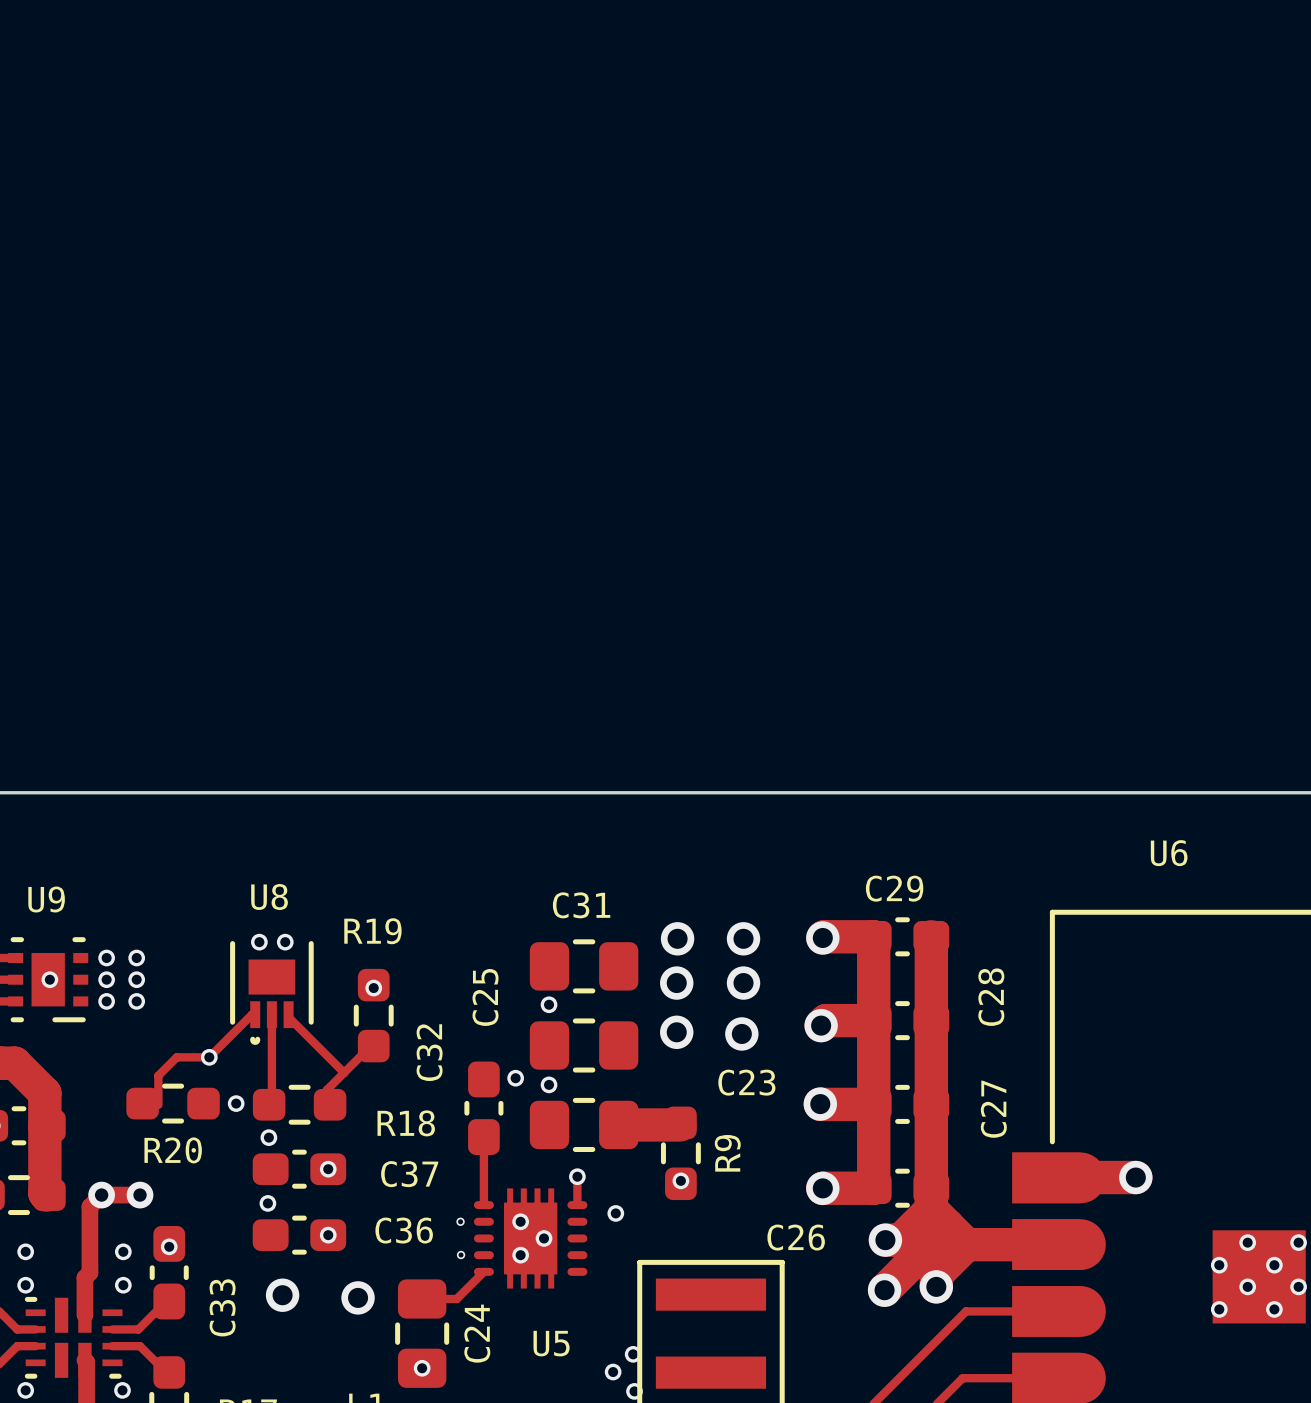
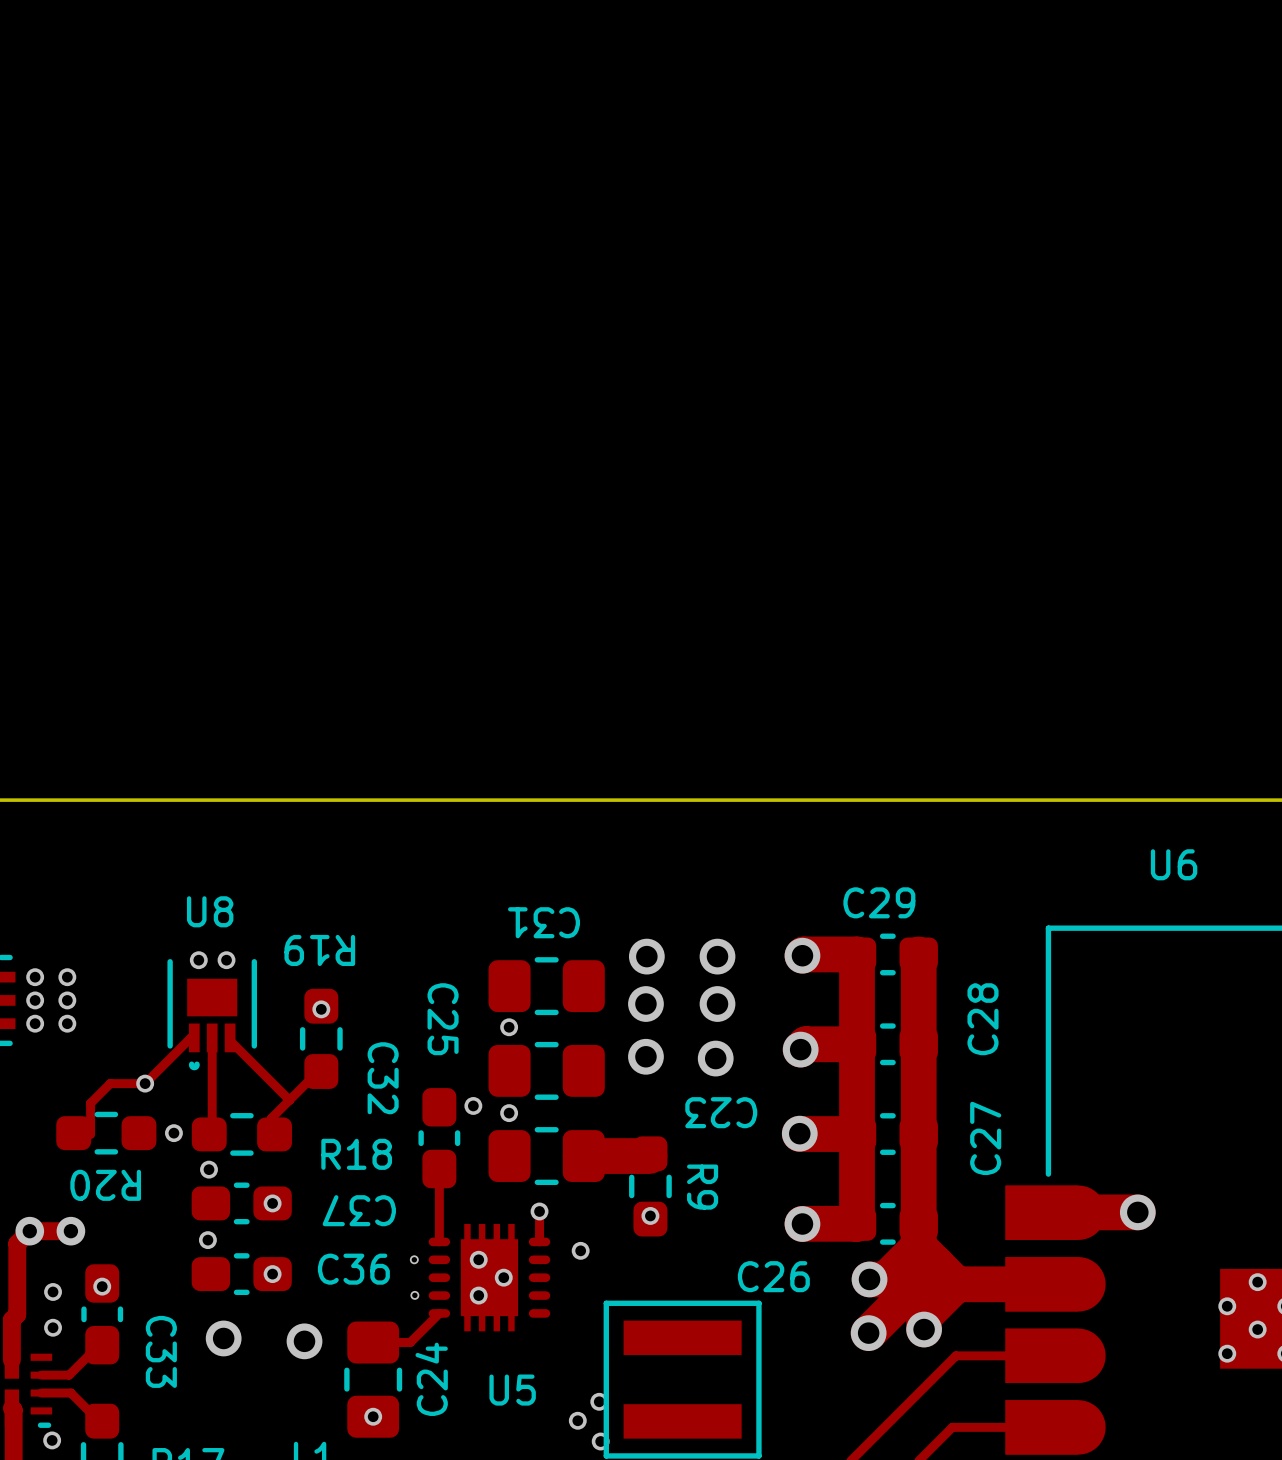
C31 name rotation: 0° (581, 905) -> 180° (544, 922)
R19 name rotation: 0° (372, 931) -> 180° (319, 950)
C25 name rotation: 0° (485, 997) -> 180° (443, 1019)
C32 name rotation: 0° (429, 1052) -> 180° (383, 1078)
C23 name rotation: 0° (746, 1082) -> 180° (721, 1112)
R20 name rotation: 0° (173, 1150) -> 180° (105, 1185)
R9 name rotation: 0° (727, 1153) -> 180° (702, 1187)
C37 name rotation: 0° (409, 1174) -> 180° (359, 1210)
C33 name rotation: 0° (222, 1307) -> 180° (161, 1351)

